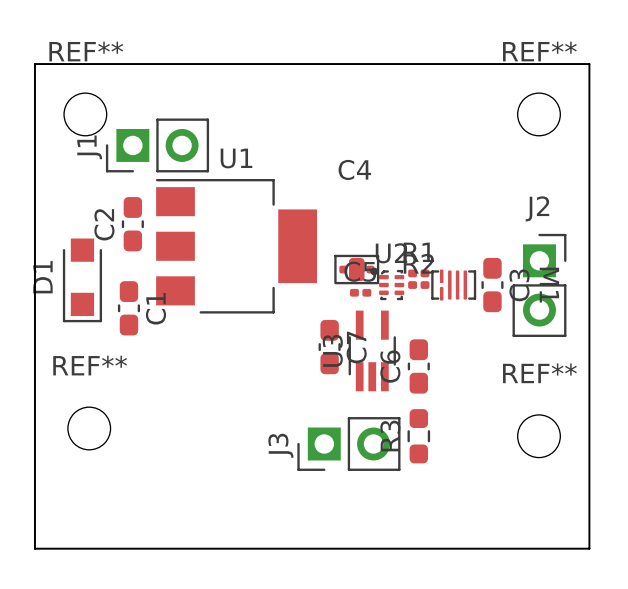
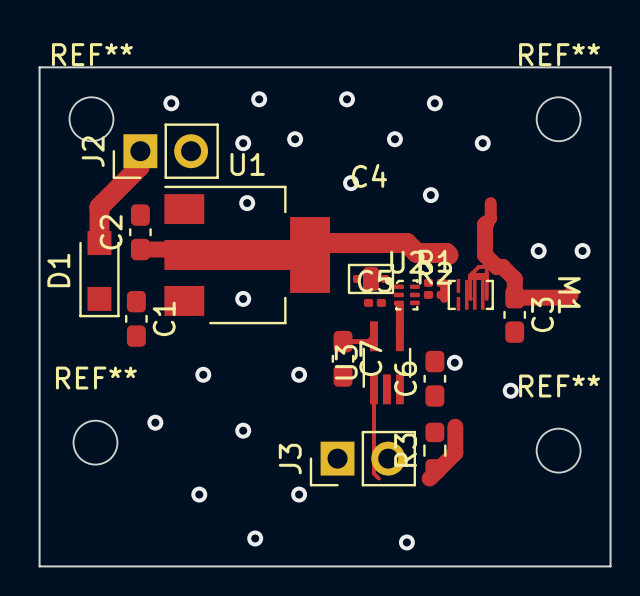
via: none -> (259, 99)
via: none -> (347, 99)
via: none -> (171, 103)
via: none -> (434, 103)
via: none -> (295, 139)
via: none -> (394, 139)
via: none -> (243, 143)
via: none -> (482, 143)
track: none -> (139, 151) (139, 167) (99, 207) (99, 243)
J1 name: J1 (89, 147) -> J2 (93, 151)
via: none -> (351, 183)
via: none -> (430, 195)
via: none -> (247, 203)
track: none -> (490, 203) (490, 219) (485, 224) (485, 255)
track: none -> (140, 249) (178, 249) (184, 255) (310, 255)
via: none -> (538, 251)
via: none -> (582, 251)
track: none -> (310, 255) (322, 243) (406, 243) (416, 253) (446, 253) (448, 255) (444, 258)
track: none -> (485, 255) (496, 266) (502, 266) (514, 278) (514, 297) (567, 297) (570, 294)
track: none -> (485, 255) (485, 264) (478, 266) (470, 275) (470, 298)
track: none -> (485, 255) (486, 256) (486, 298)
track: none -> (472, 272) (474, 274) (486, 274)
track: none -> (470, 278) (486, 278)
track: none -> (444, 282) (444, 298)
D1 position: (82, 280) -> (99, 274)
C3 position: (492, 285) -> (514, 314)
J2: (539, 285) -> none
via: none -> (243, 298)
track: none -> (398, 305) (399, 336)
track: none -> (373, 336) (368, 341) (343, 341)
via: none -> (454, 362)
via: none -> (203, 374)
via: none -> (299, 374)
track: none -> (373, 389) (373, 473) (378, 478)
via: none -> (510, 390)
via: none -> (155, 422)
track: none -> (455, 426) (455, 452) (429, 478)
via: none -> (243, 430)
via: none -> (199, 494)
via: none -> (299, 494)
via: none -> (255, 538)
via: none -> (406, 542)

